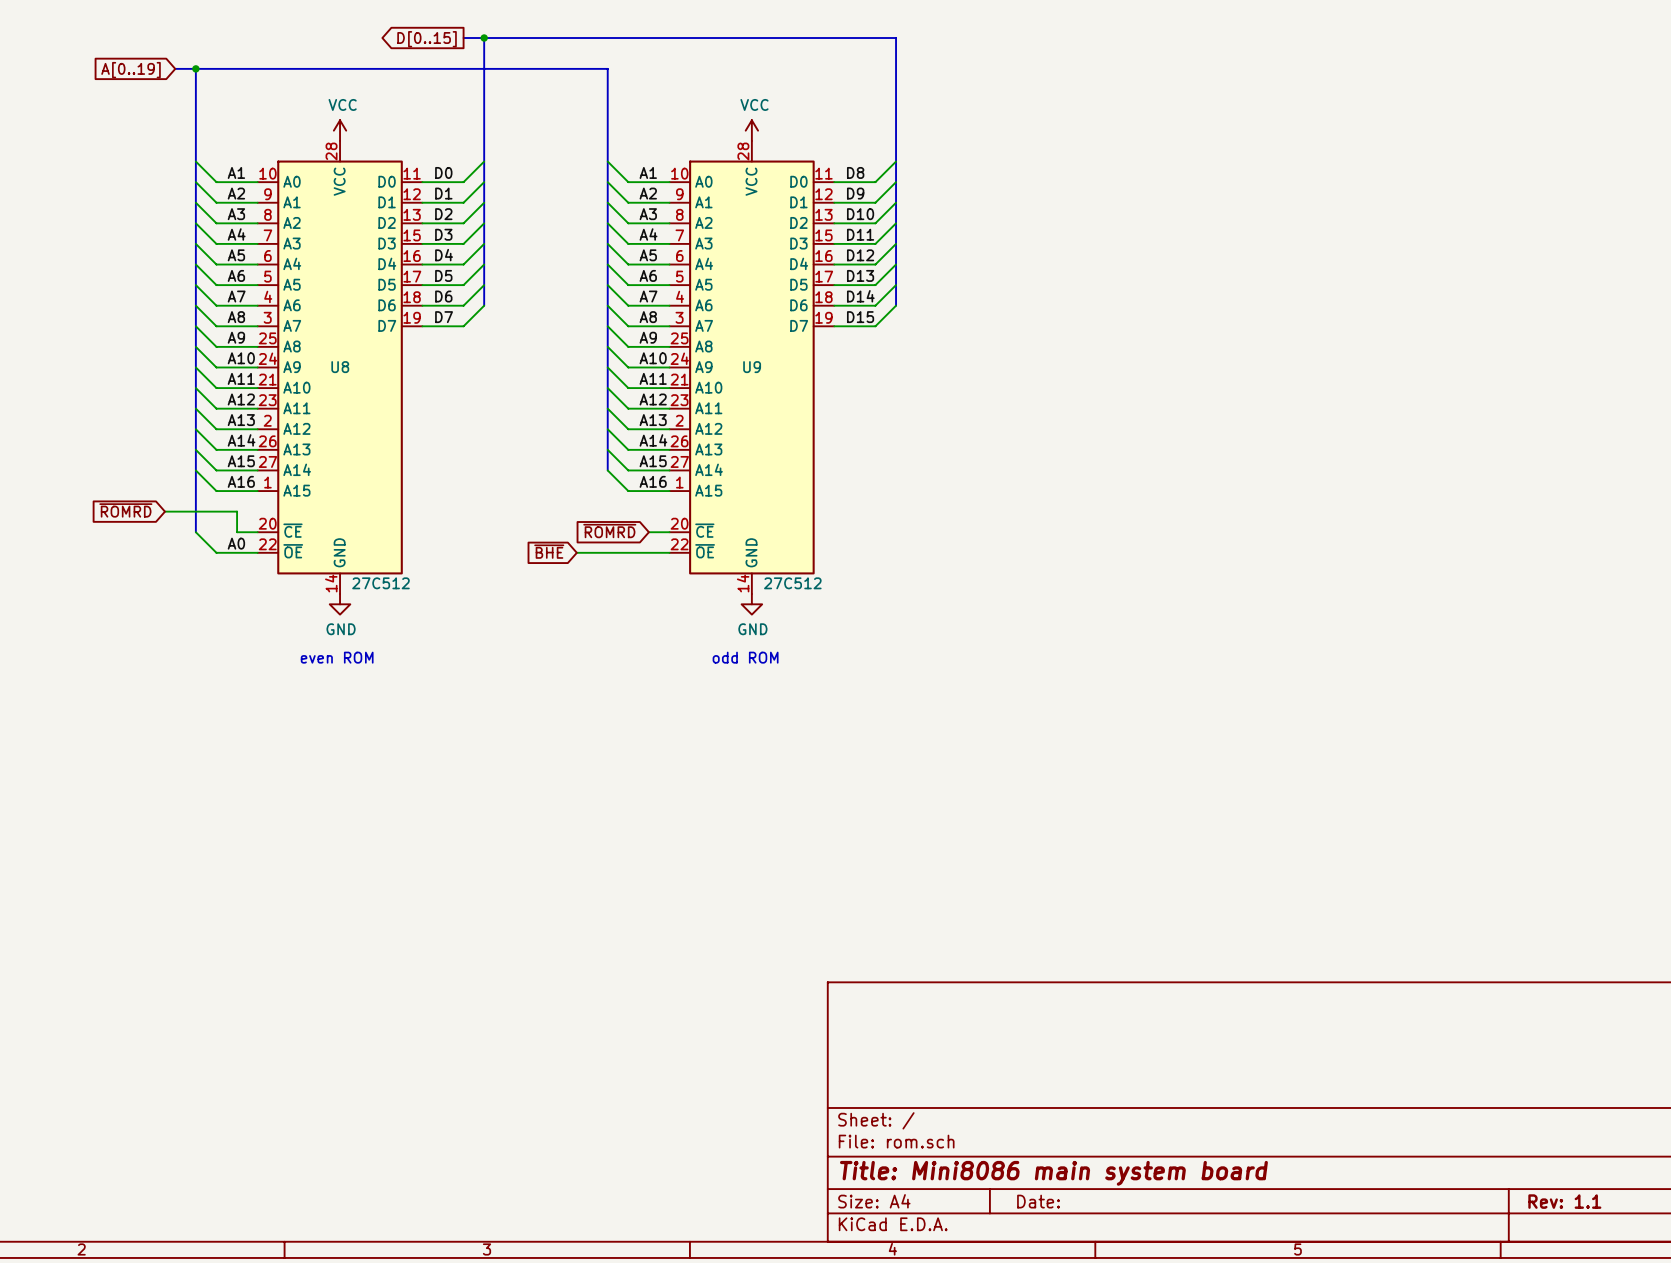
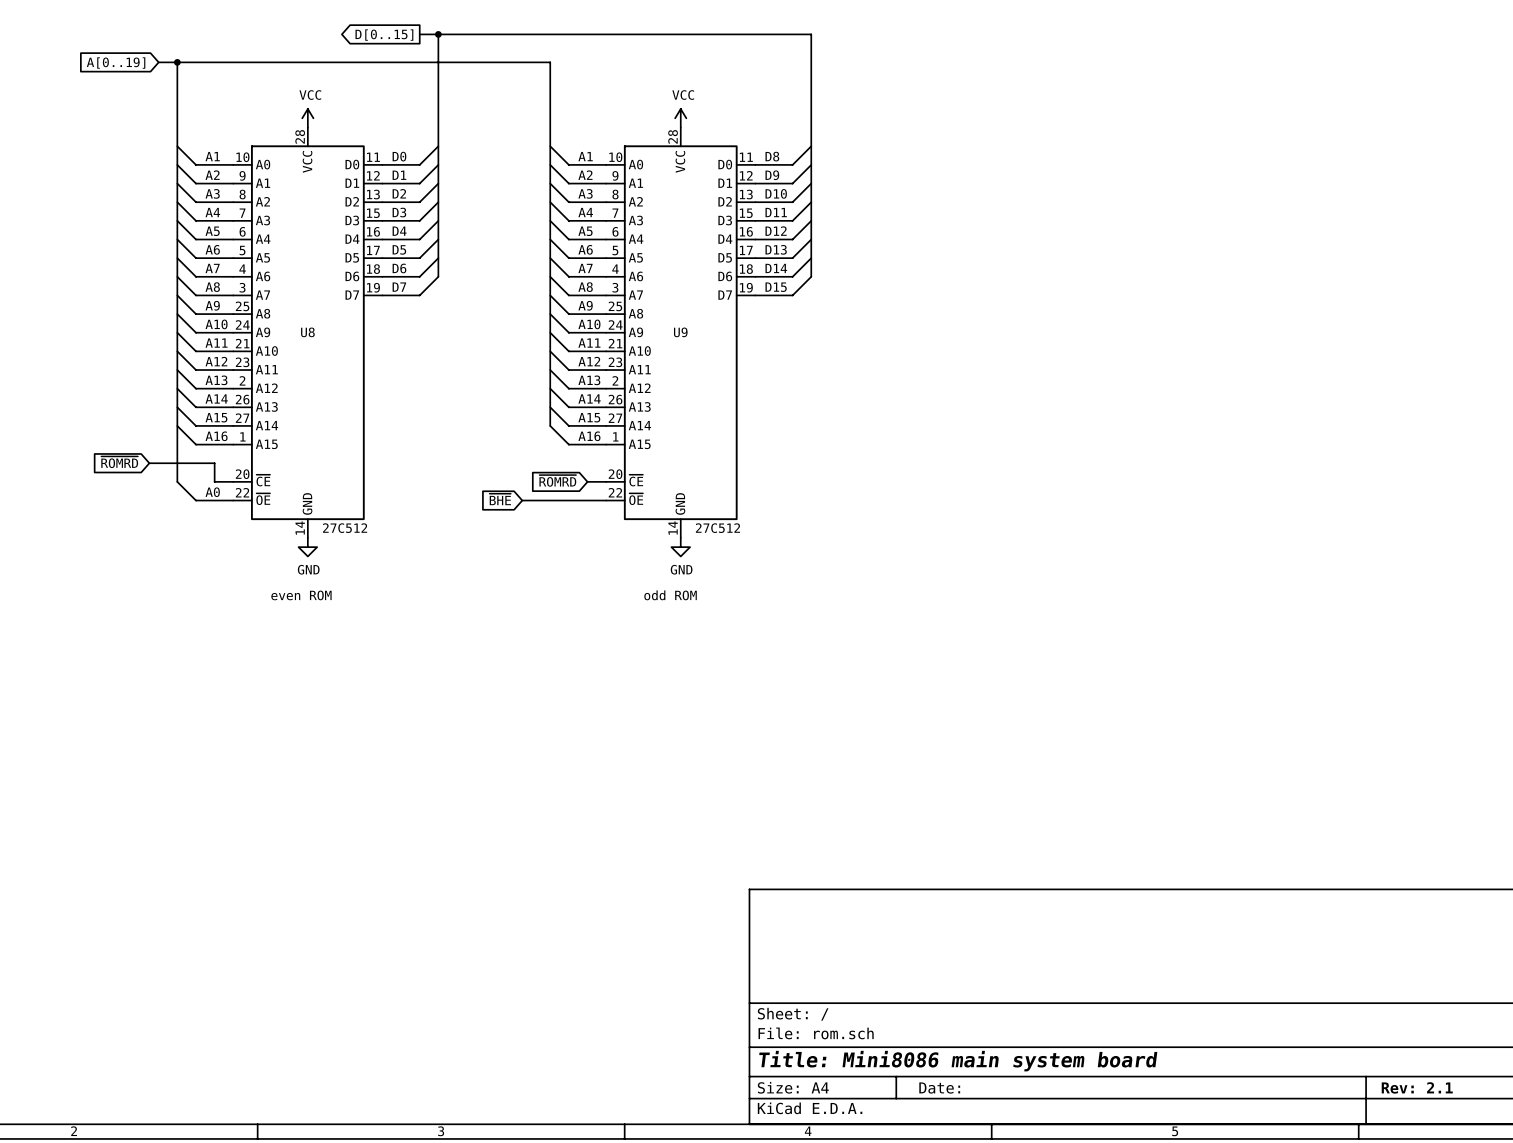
title block: Rev: 1.1 (1564, 1201) -> Rev: 2.1 (1417, 1087)

